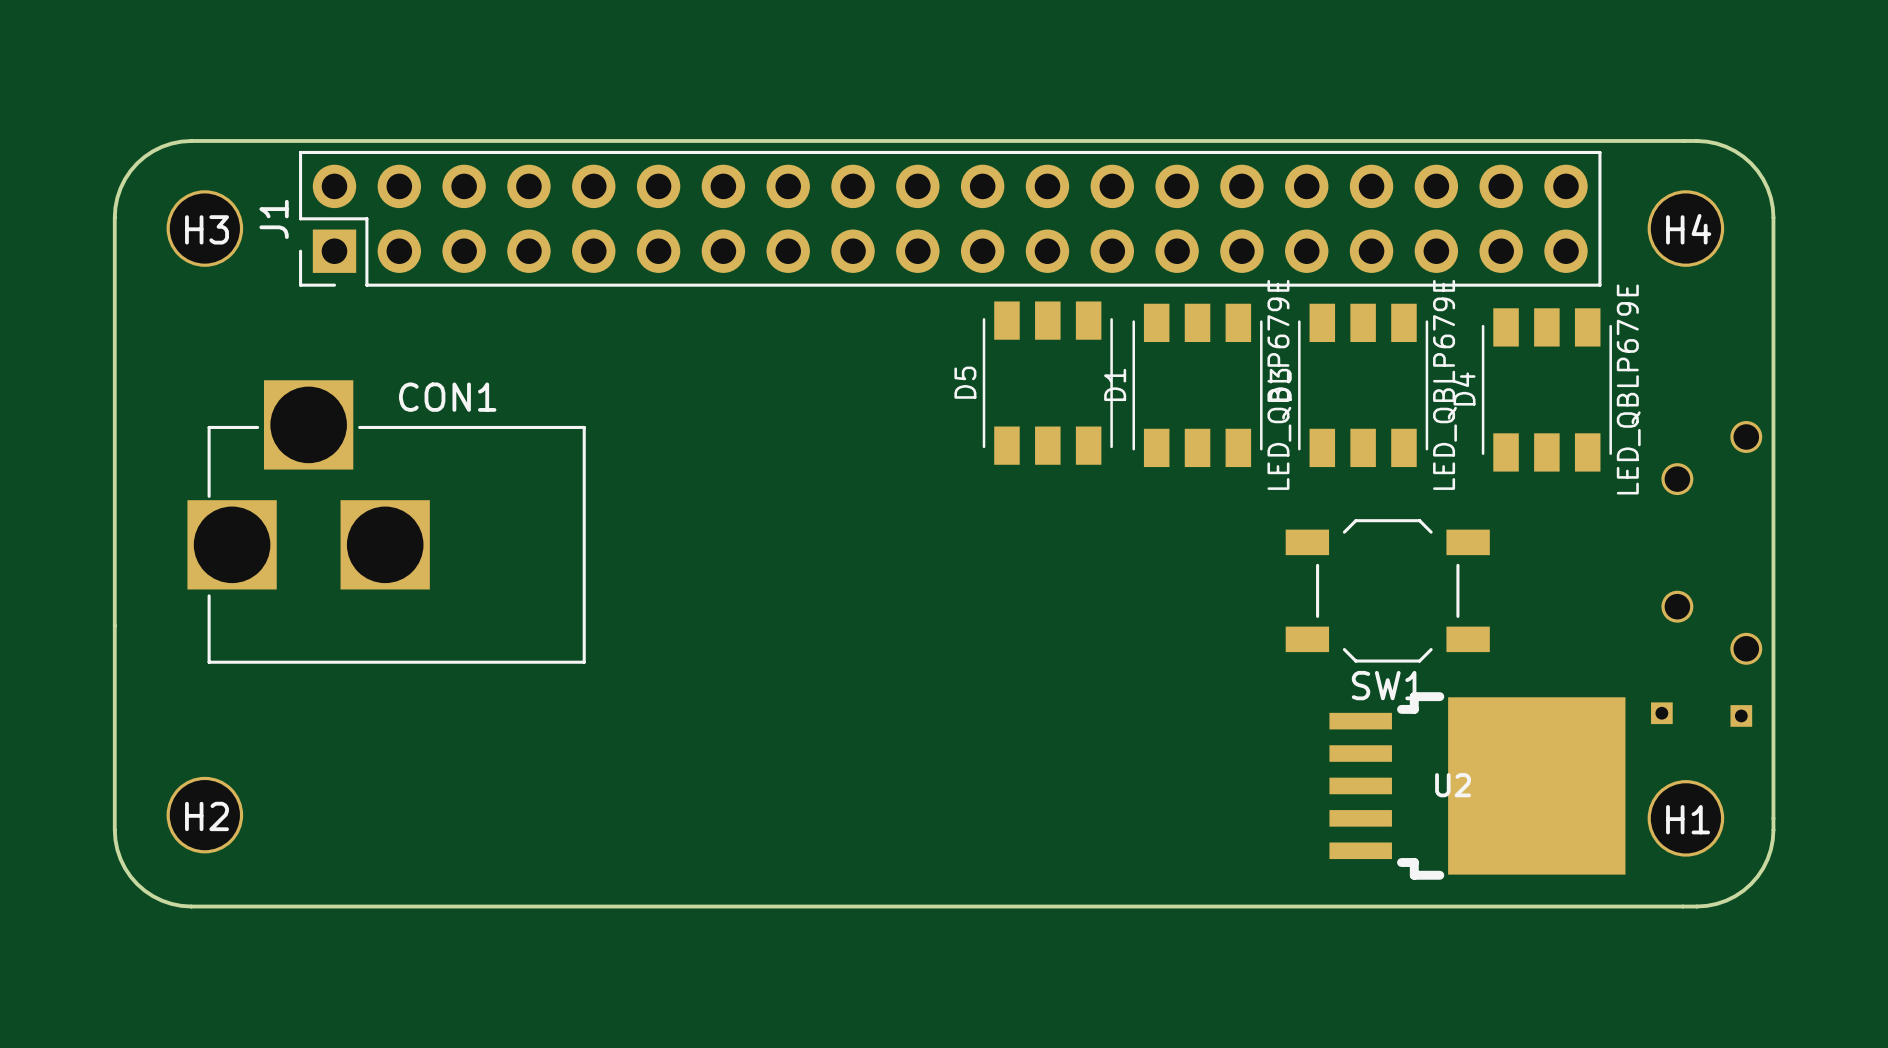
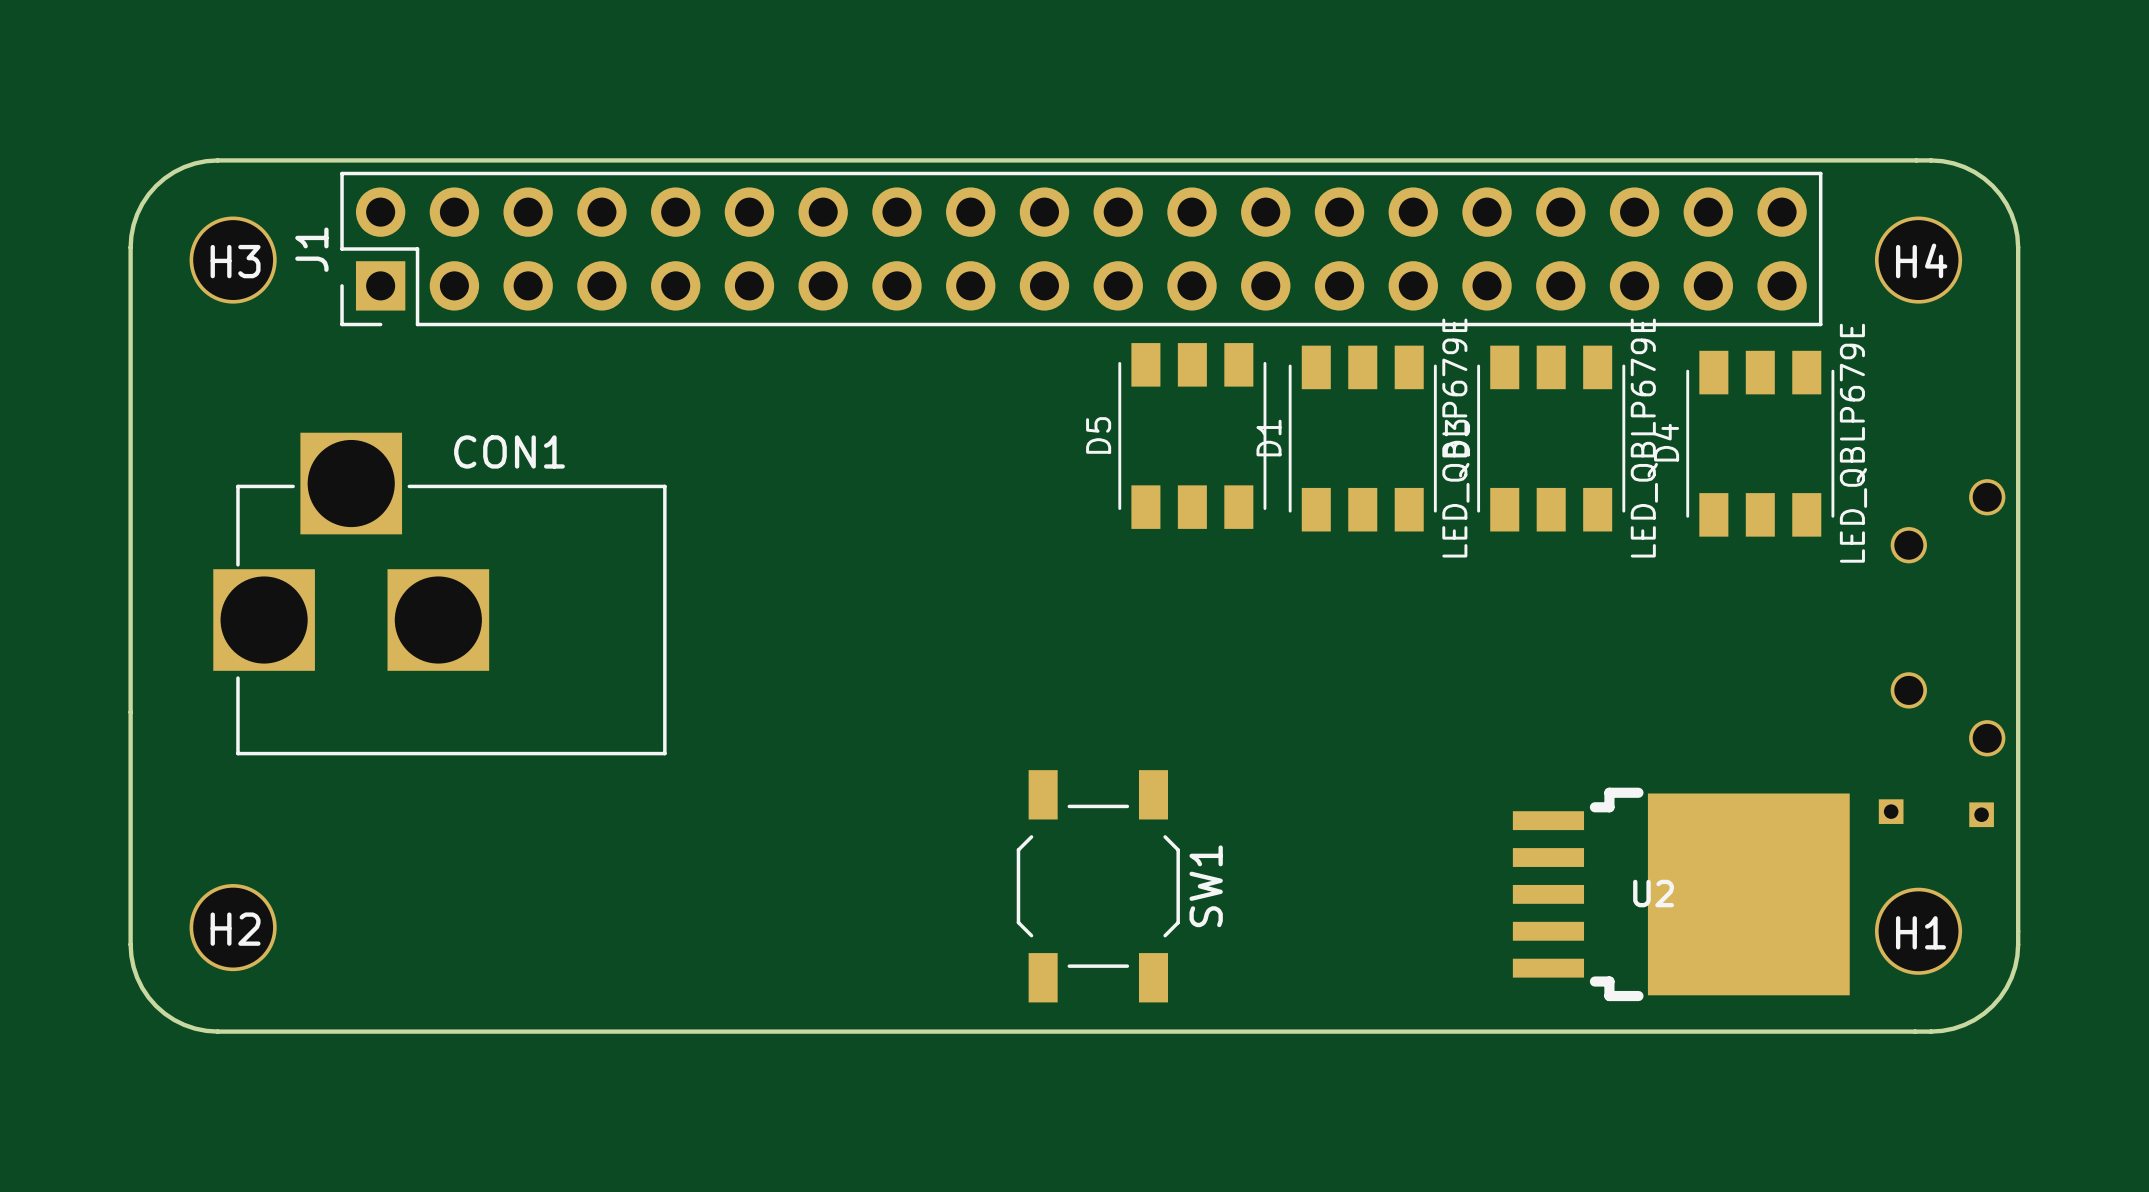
SW1 rotation: 0° (1387, 590) -> 90° clockwise (1098, 886)
SW1 position: (1387, 590) -> (1098, 886)
SW1 name position: SW1 (1387, 685) -> SW1 (1206, 886)

